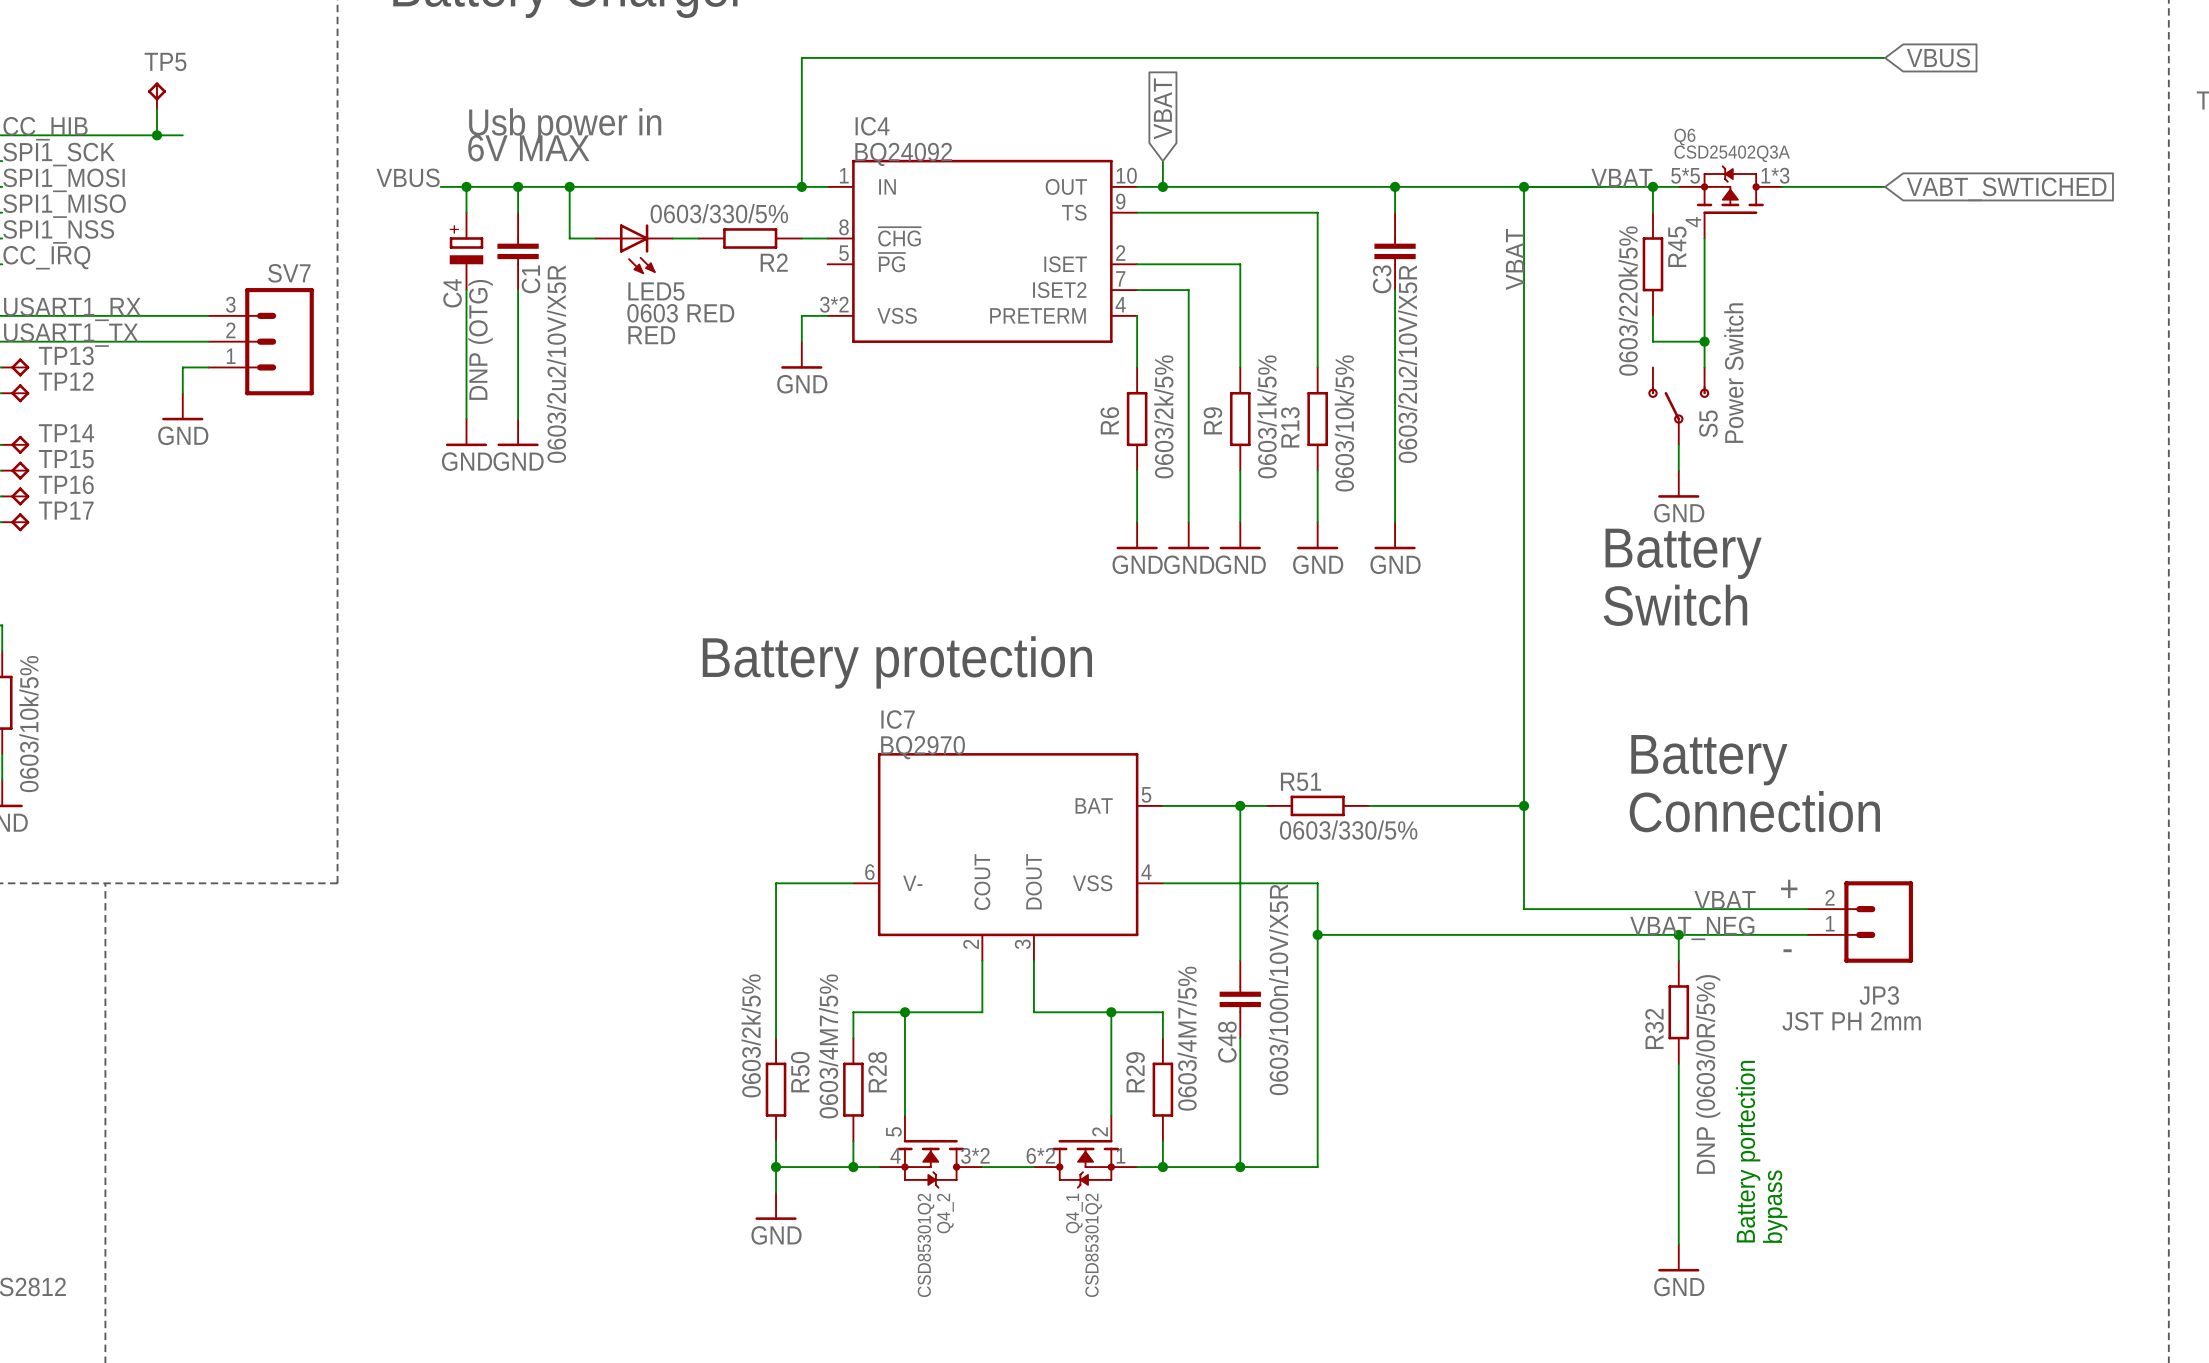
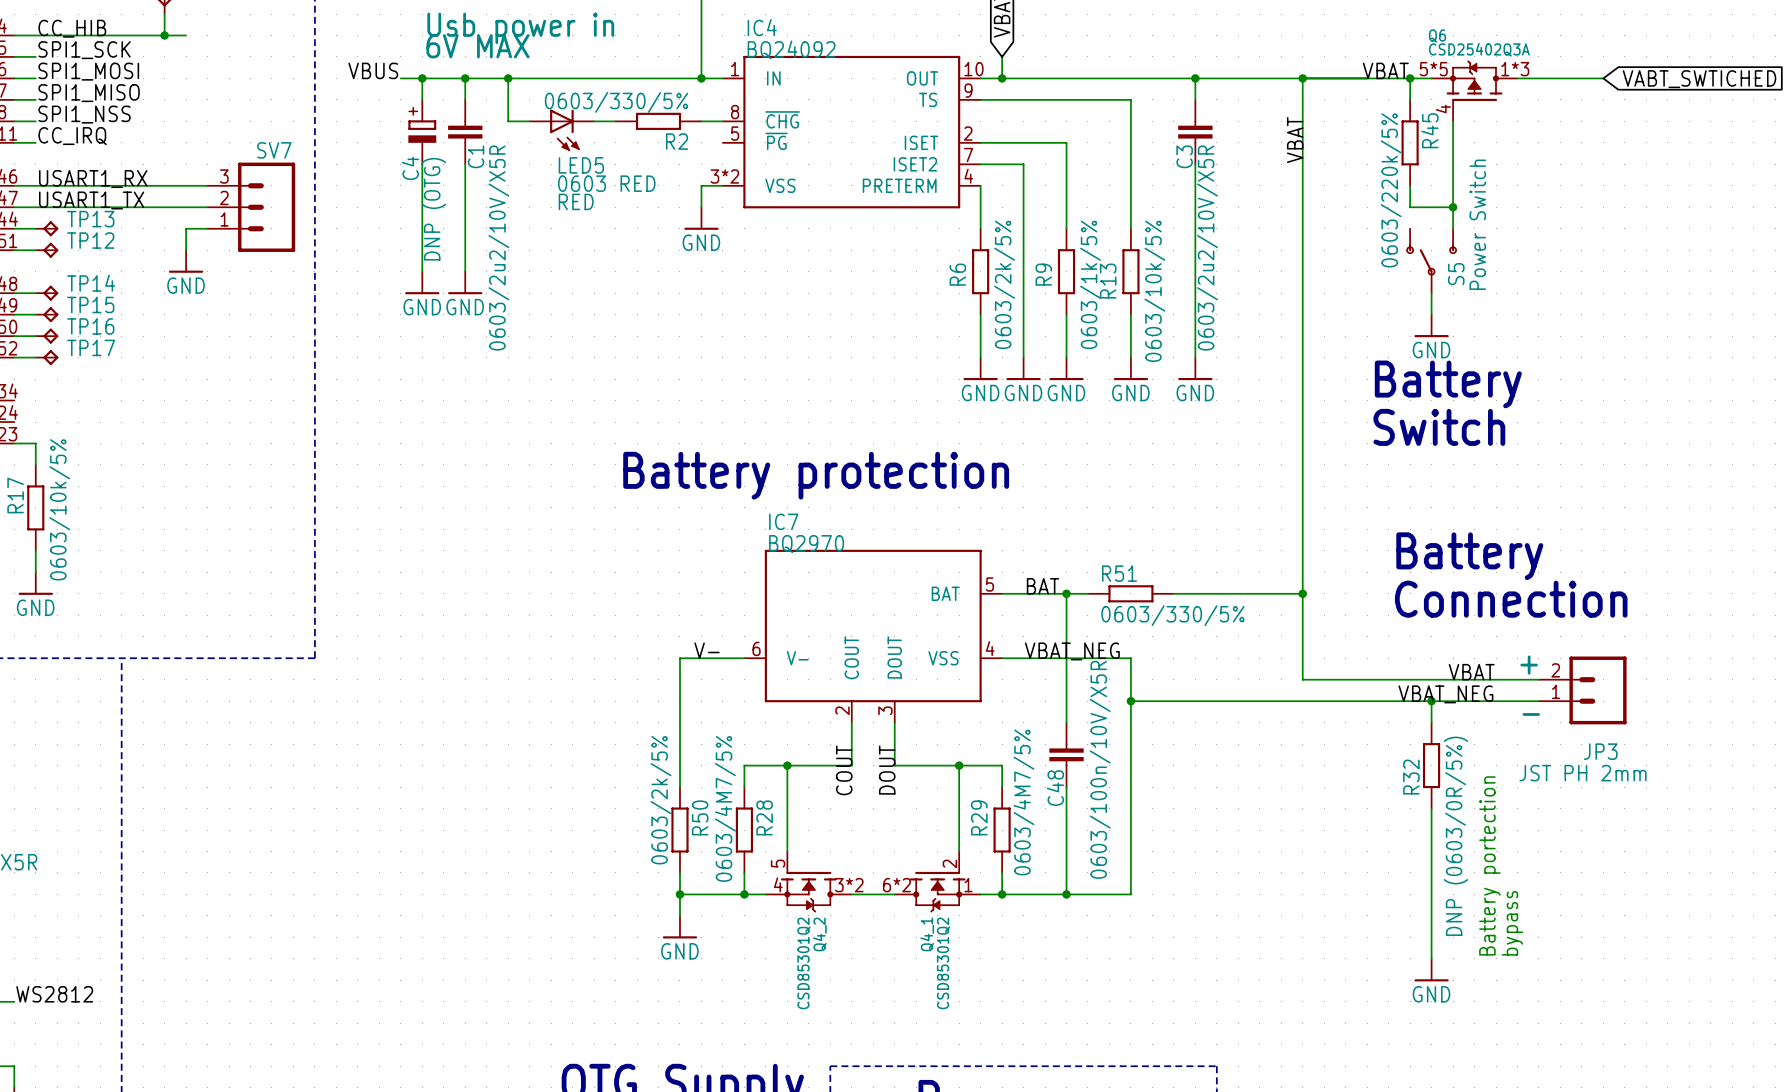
label: none -> BAT (1043, 586)
label: none -> V- (707, 650)
label: none -> VBAT_NEG (1072, 651)
label: none -> COUT (844, 770)
label: none -> DOUT (887, 770)

